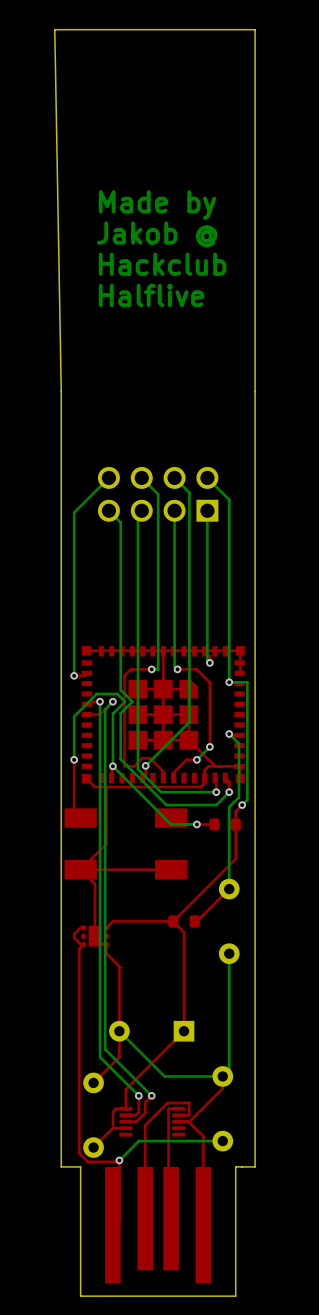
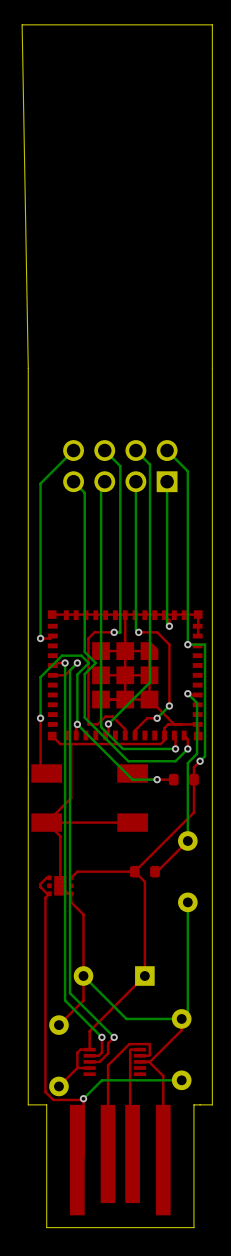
text: Made by (157, 205) -> none
text: Jakob @ (157, 234) -> none
text: Hackclub (162, 264) -> none
text: Halflive (151, 295) -> none

